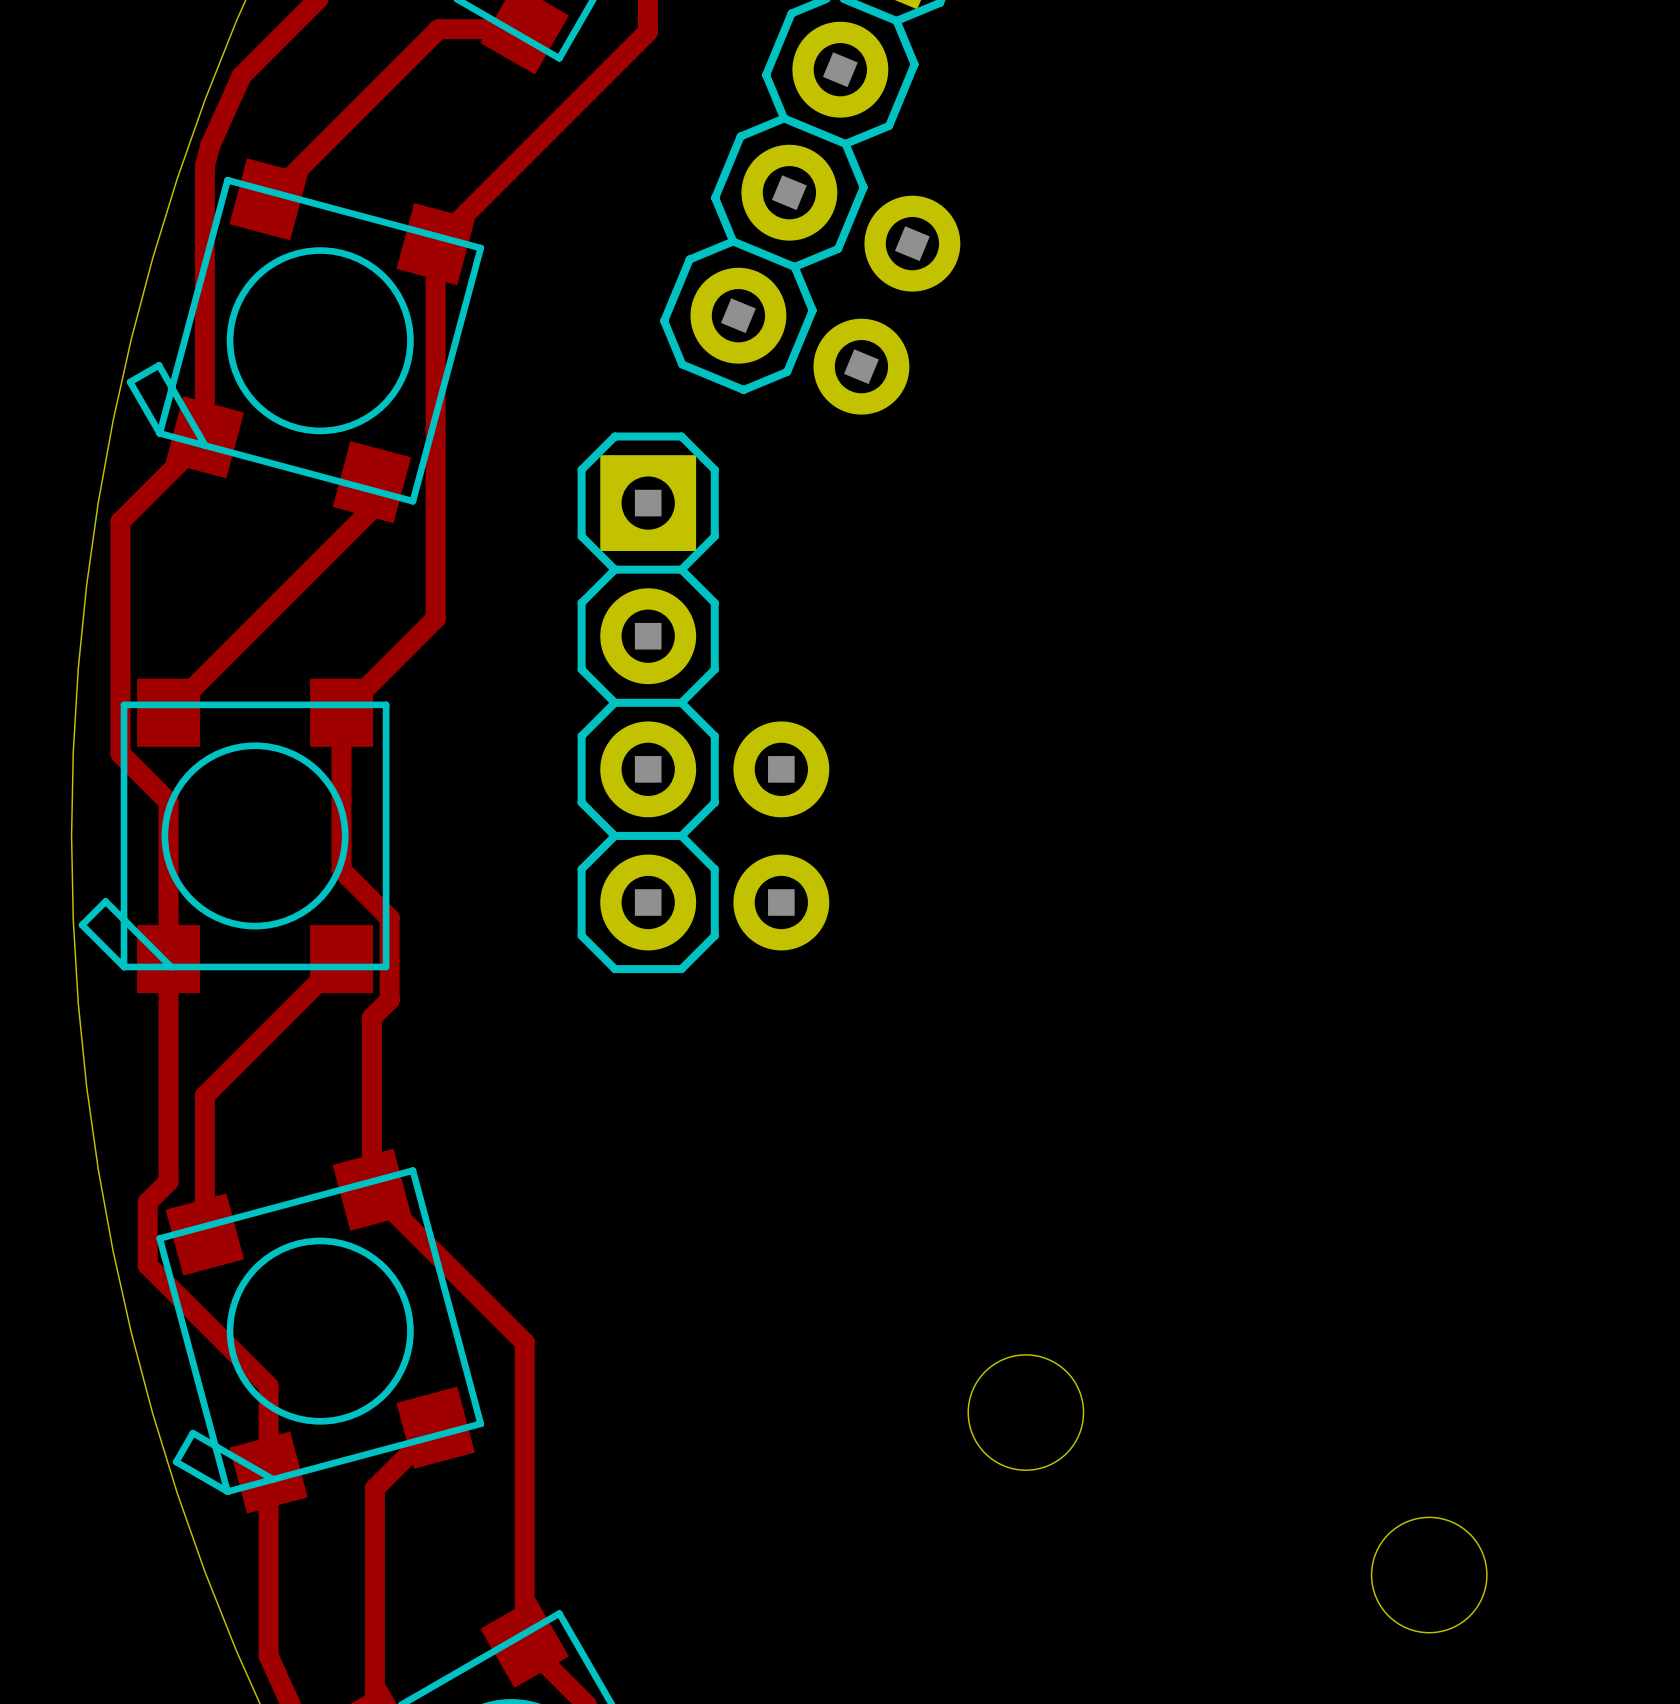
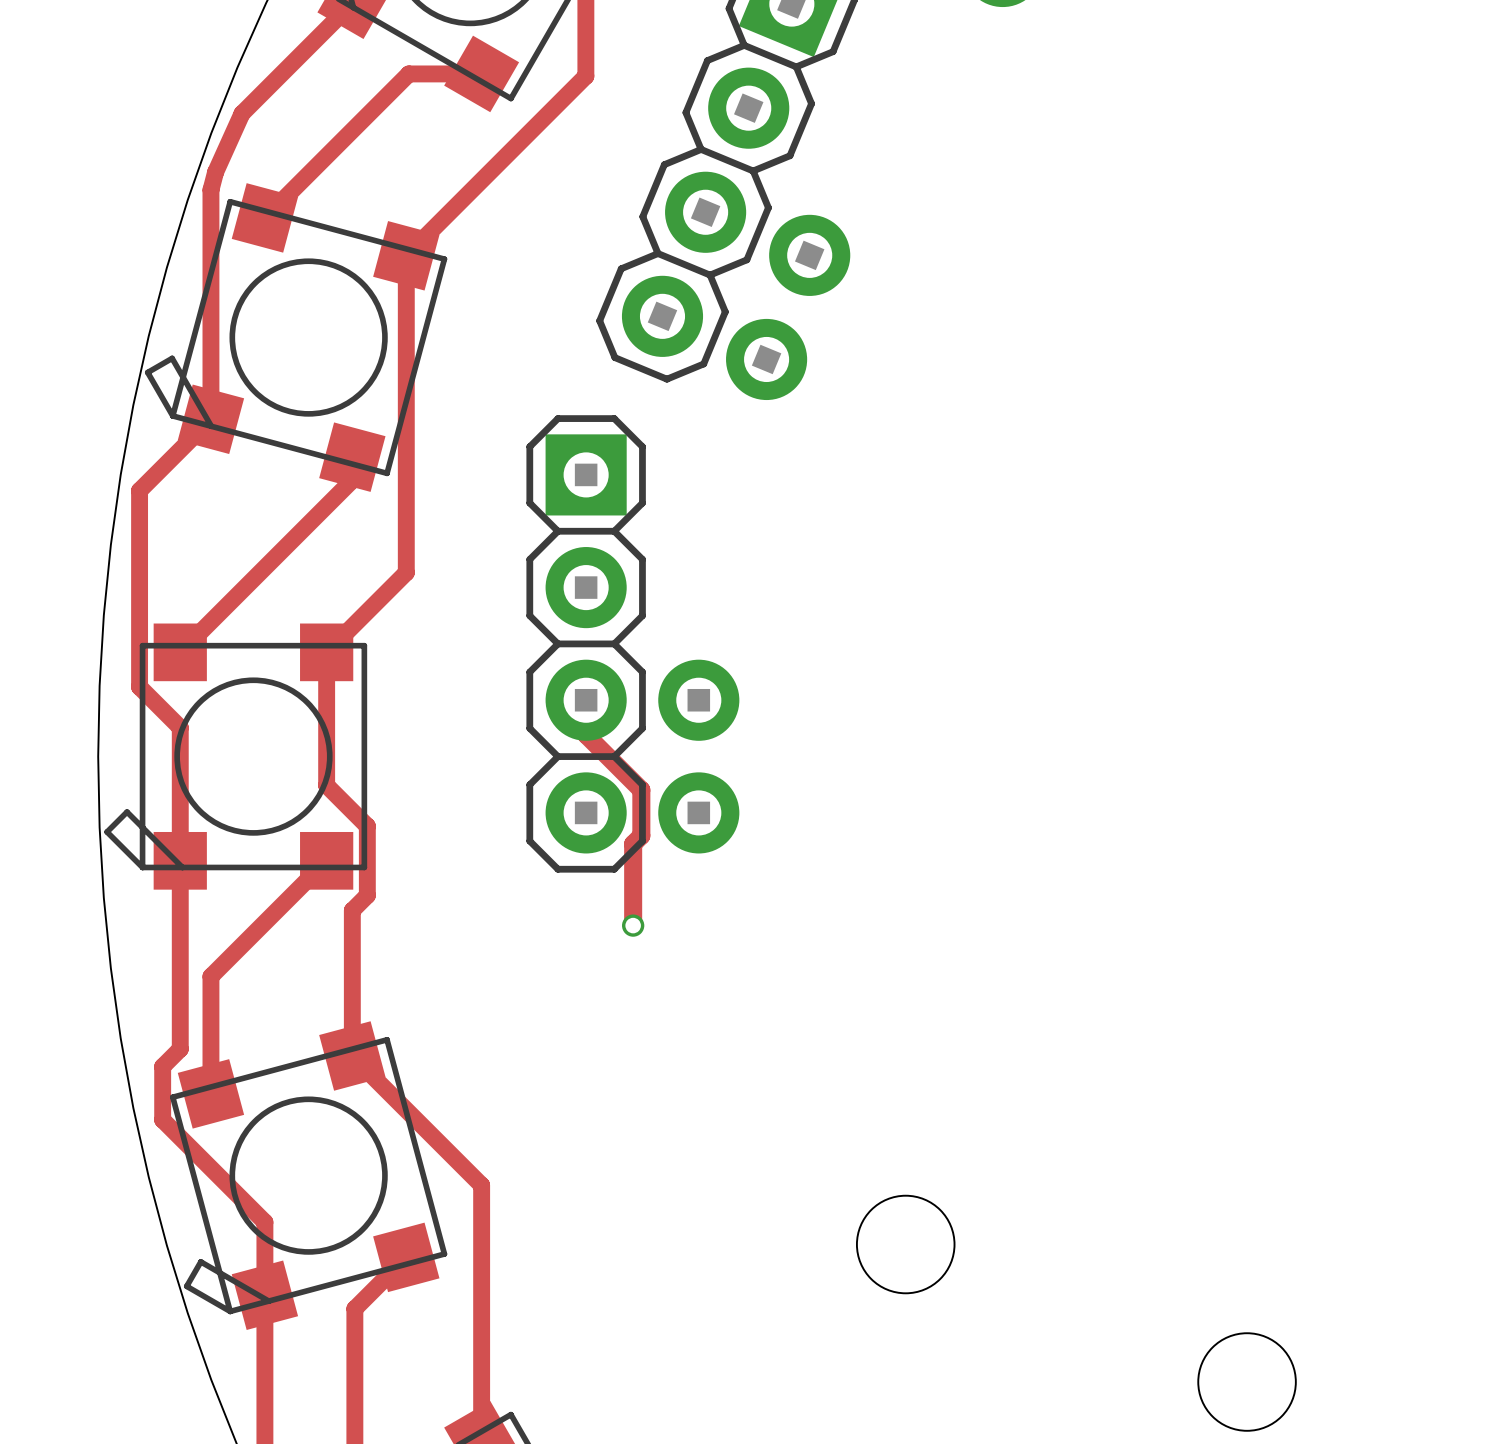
track: none -> (586, 700) (586, 734) (641, 790) (641, 835) (633, 843) (633, 925)
via: none -> (633, 925)

